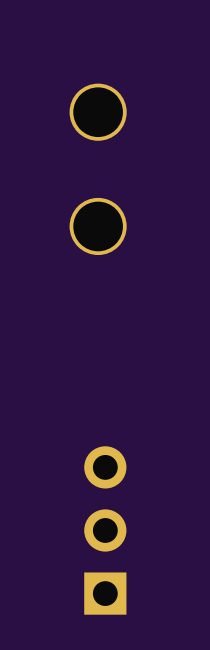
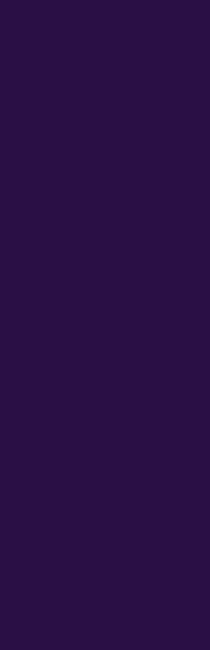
part: (98, 169) -> none
part: (105, 530) -> none

